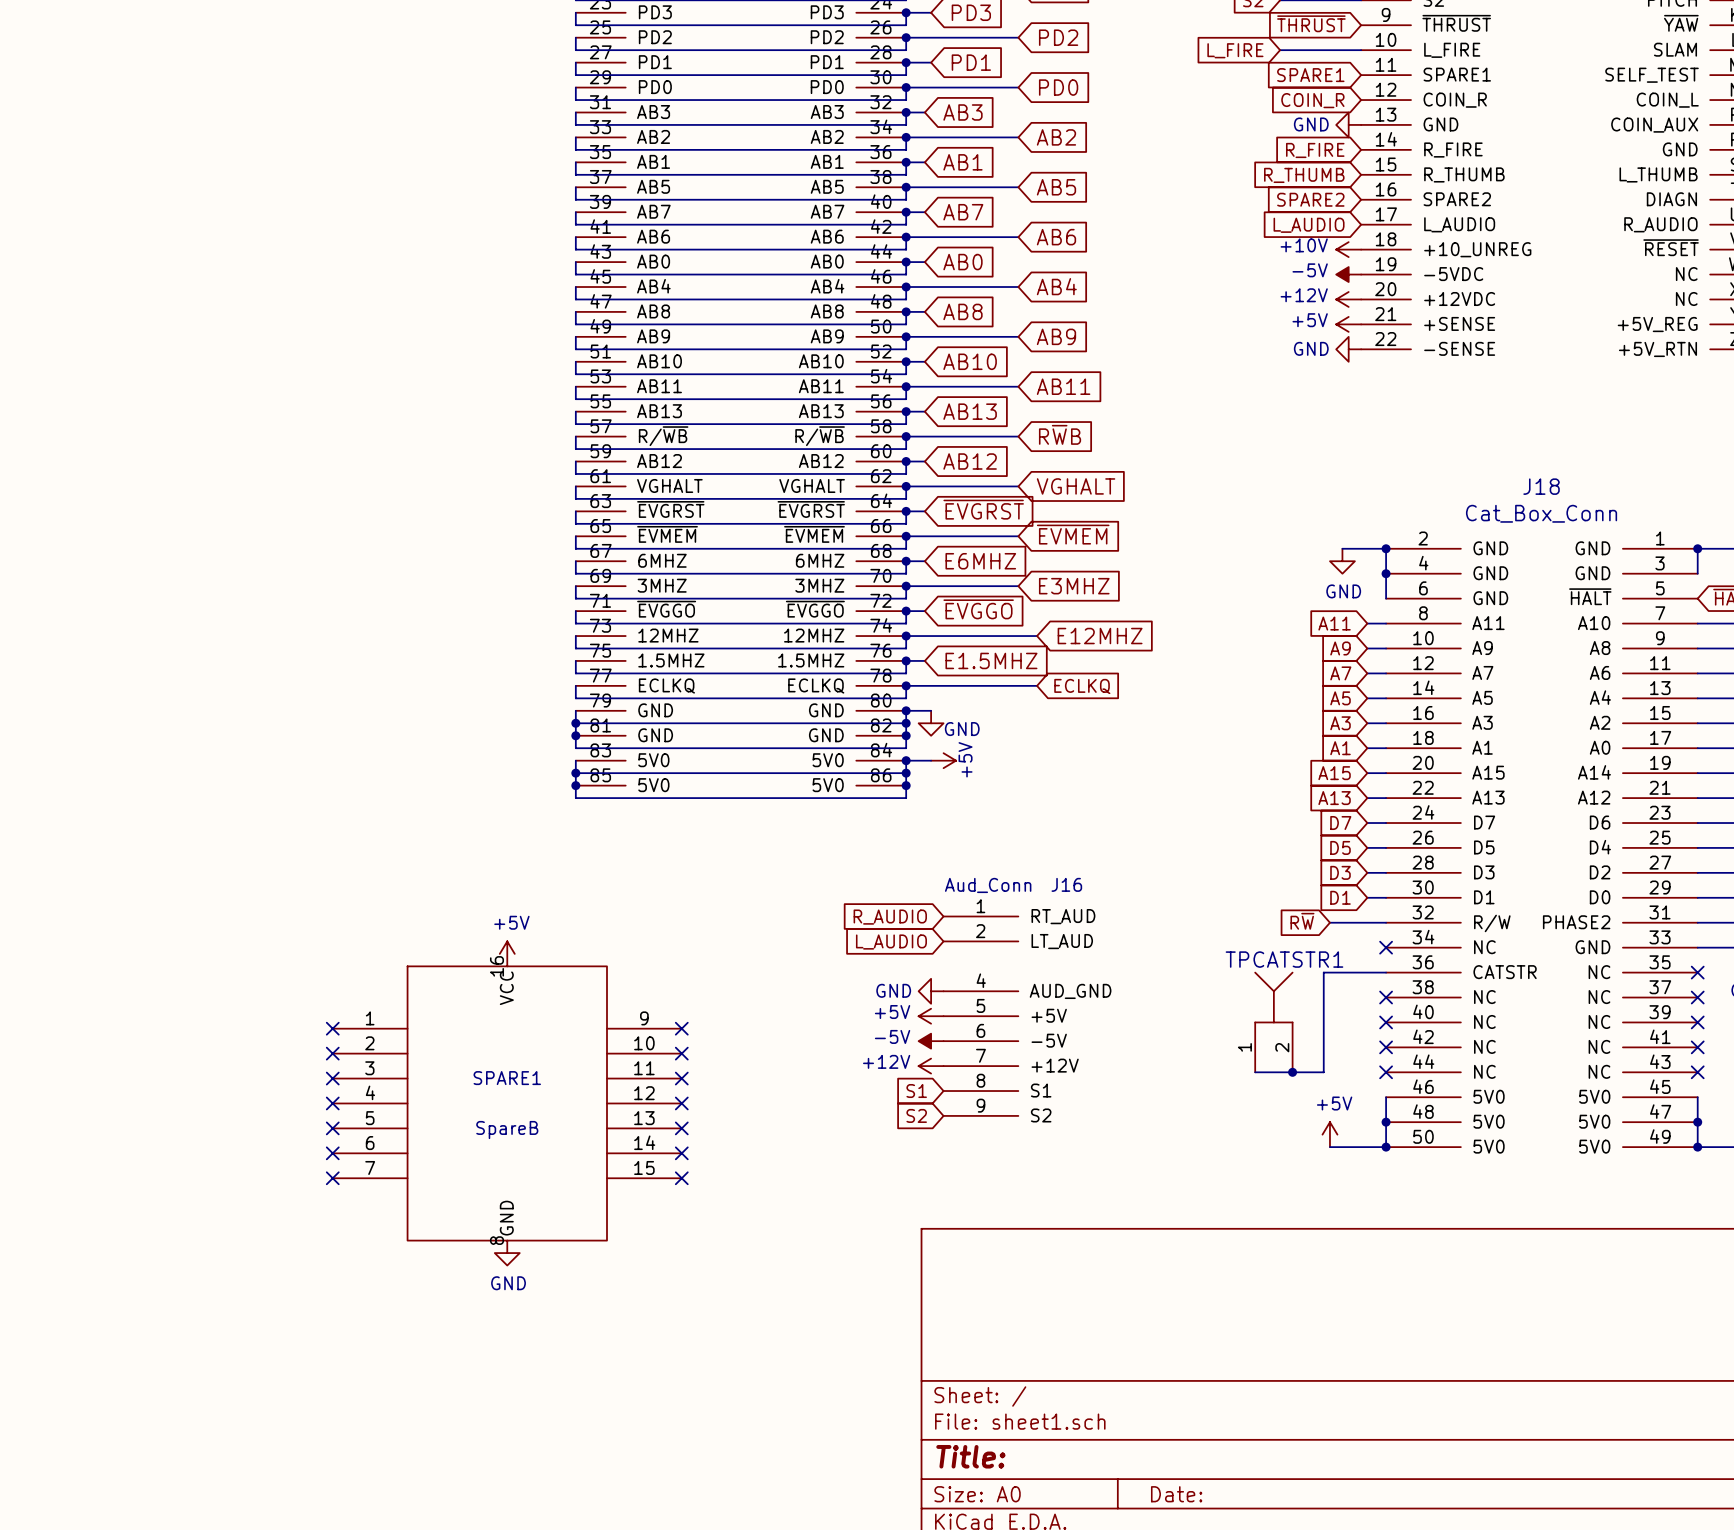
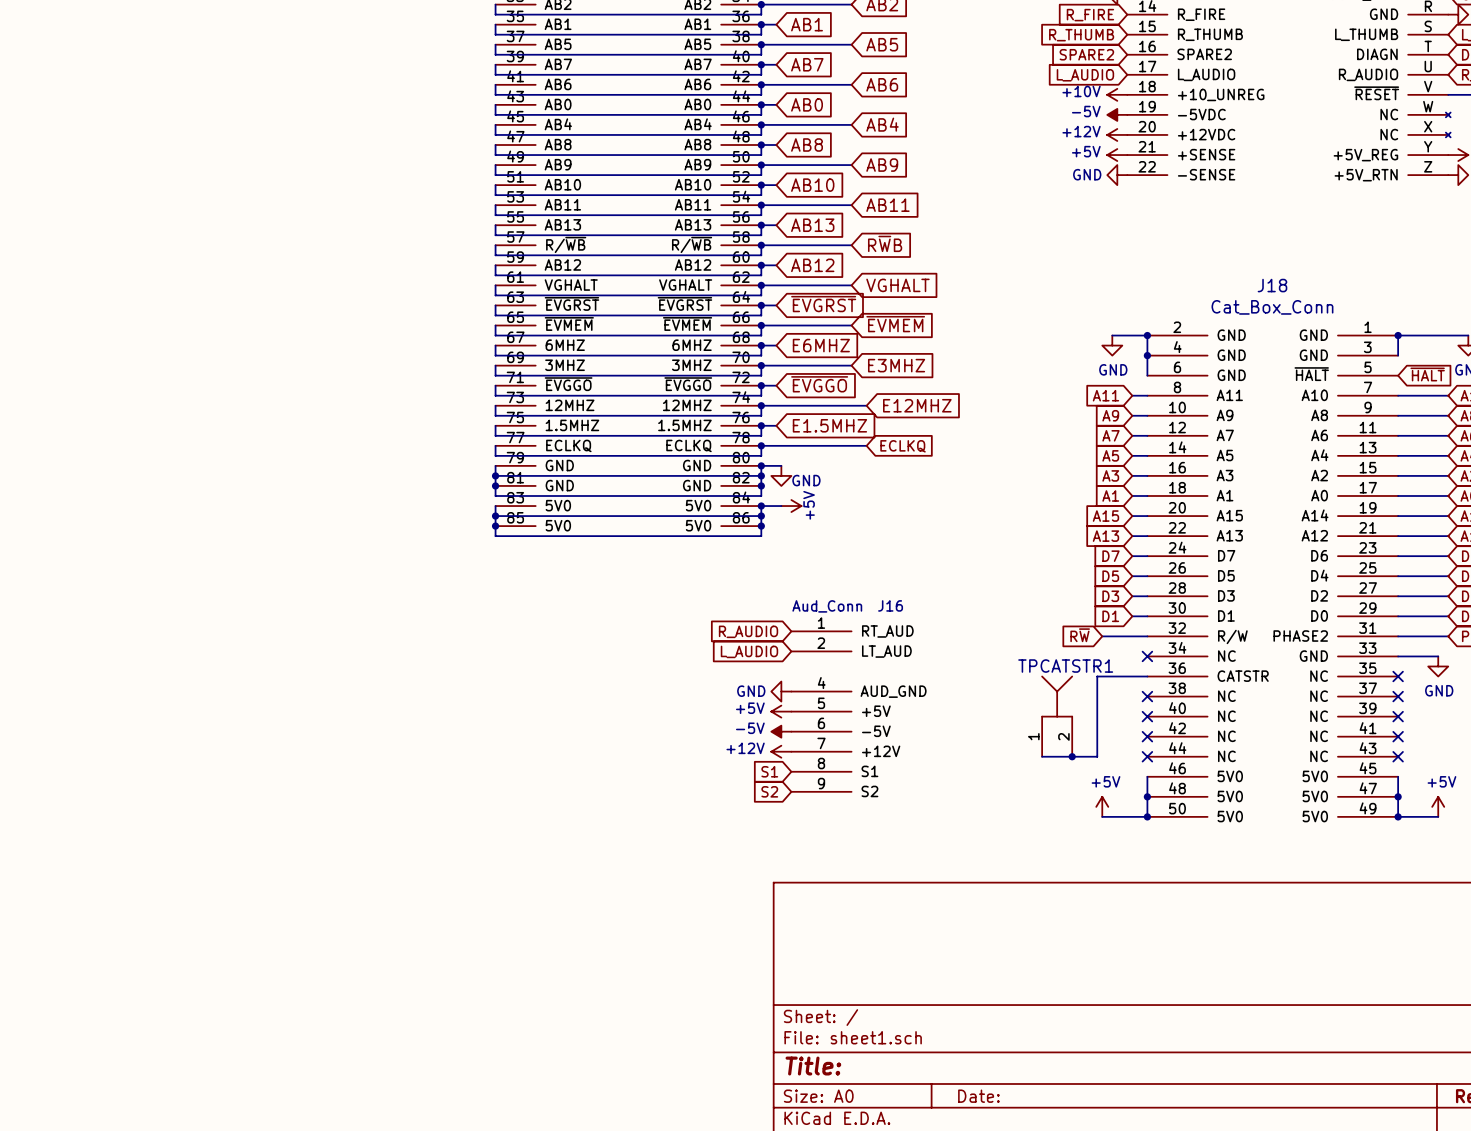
power symbol: +5V (507, 953) -> none
no-connect mark: (332, 1028) -> none
no-connect mark: (681, 1028) -> none
no-connect mark: (332, 1053) -> none
no-connect mark: (681, 1053) -> none
no-connect mark: (332, 1078) -> none
no-connect mark: (681, 1078) -> none
no-connect mark: (332, 1103) -> none
SPARE1: SpareB (507, 1103) -> none
no-connect mark: (681, 1103) -> none
no-connect mark: (332, 1128) -> none
no-connect mark: (681, 1128) -> none
no-connect mark: (332, 1153) -> none
no-connect mark: (681, 1153) -> none
no-connect mark: (332, 1178) -> none
no-connect mark: (681, 1178) -> none
power symbol: GND (507, 1253) -> none

